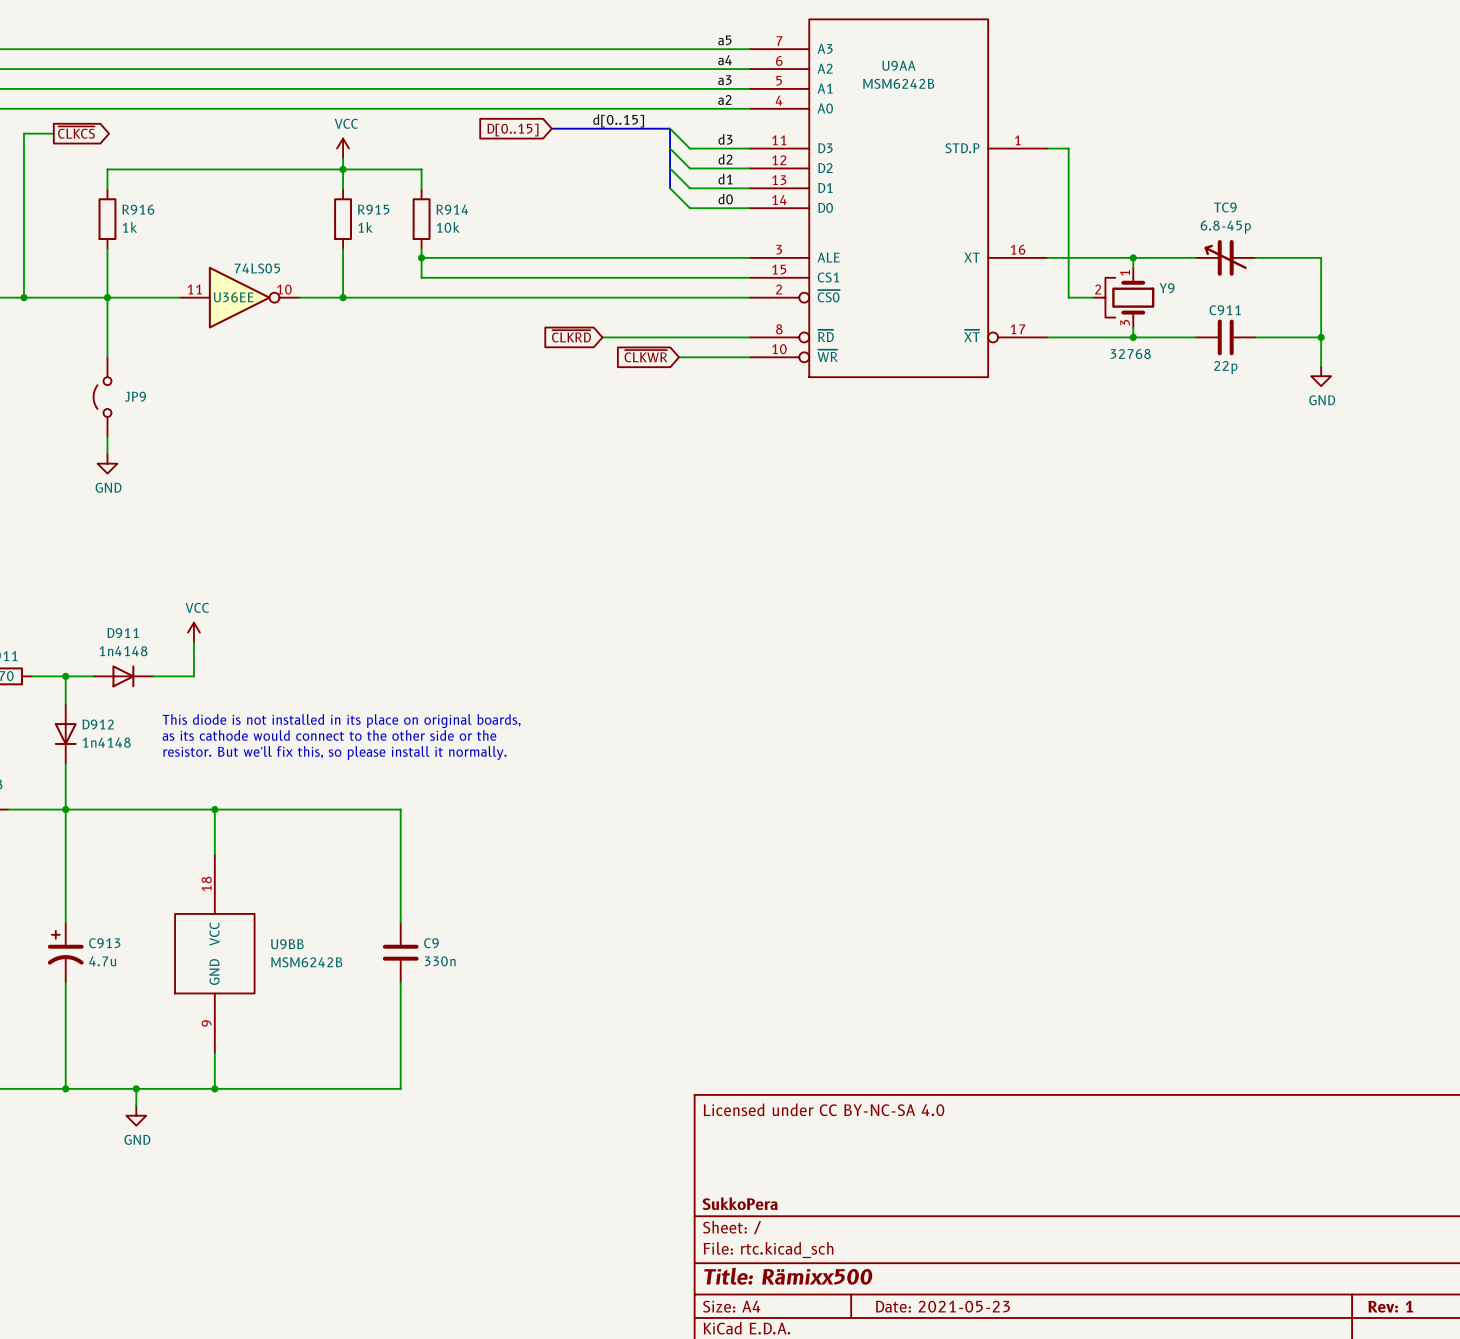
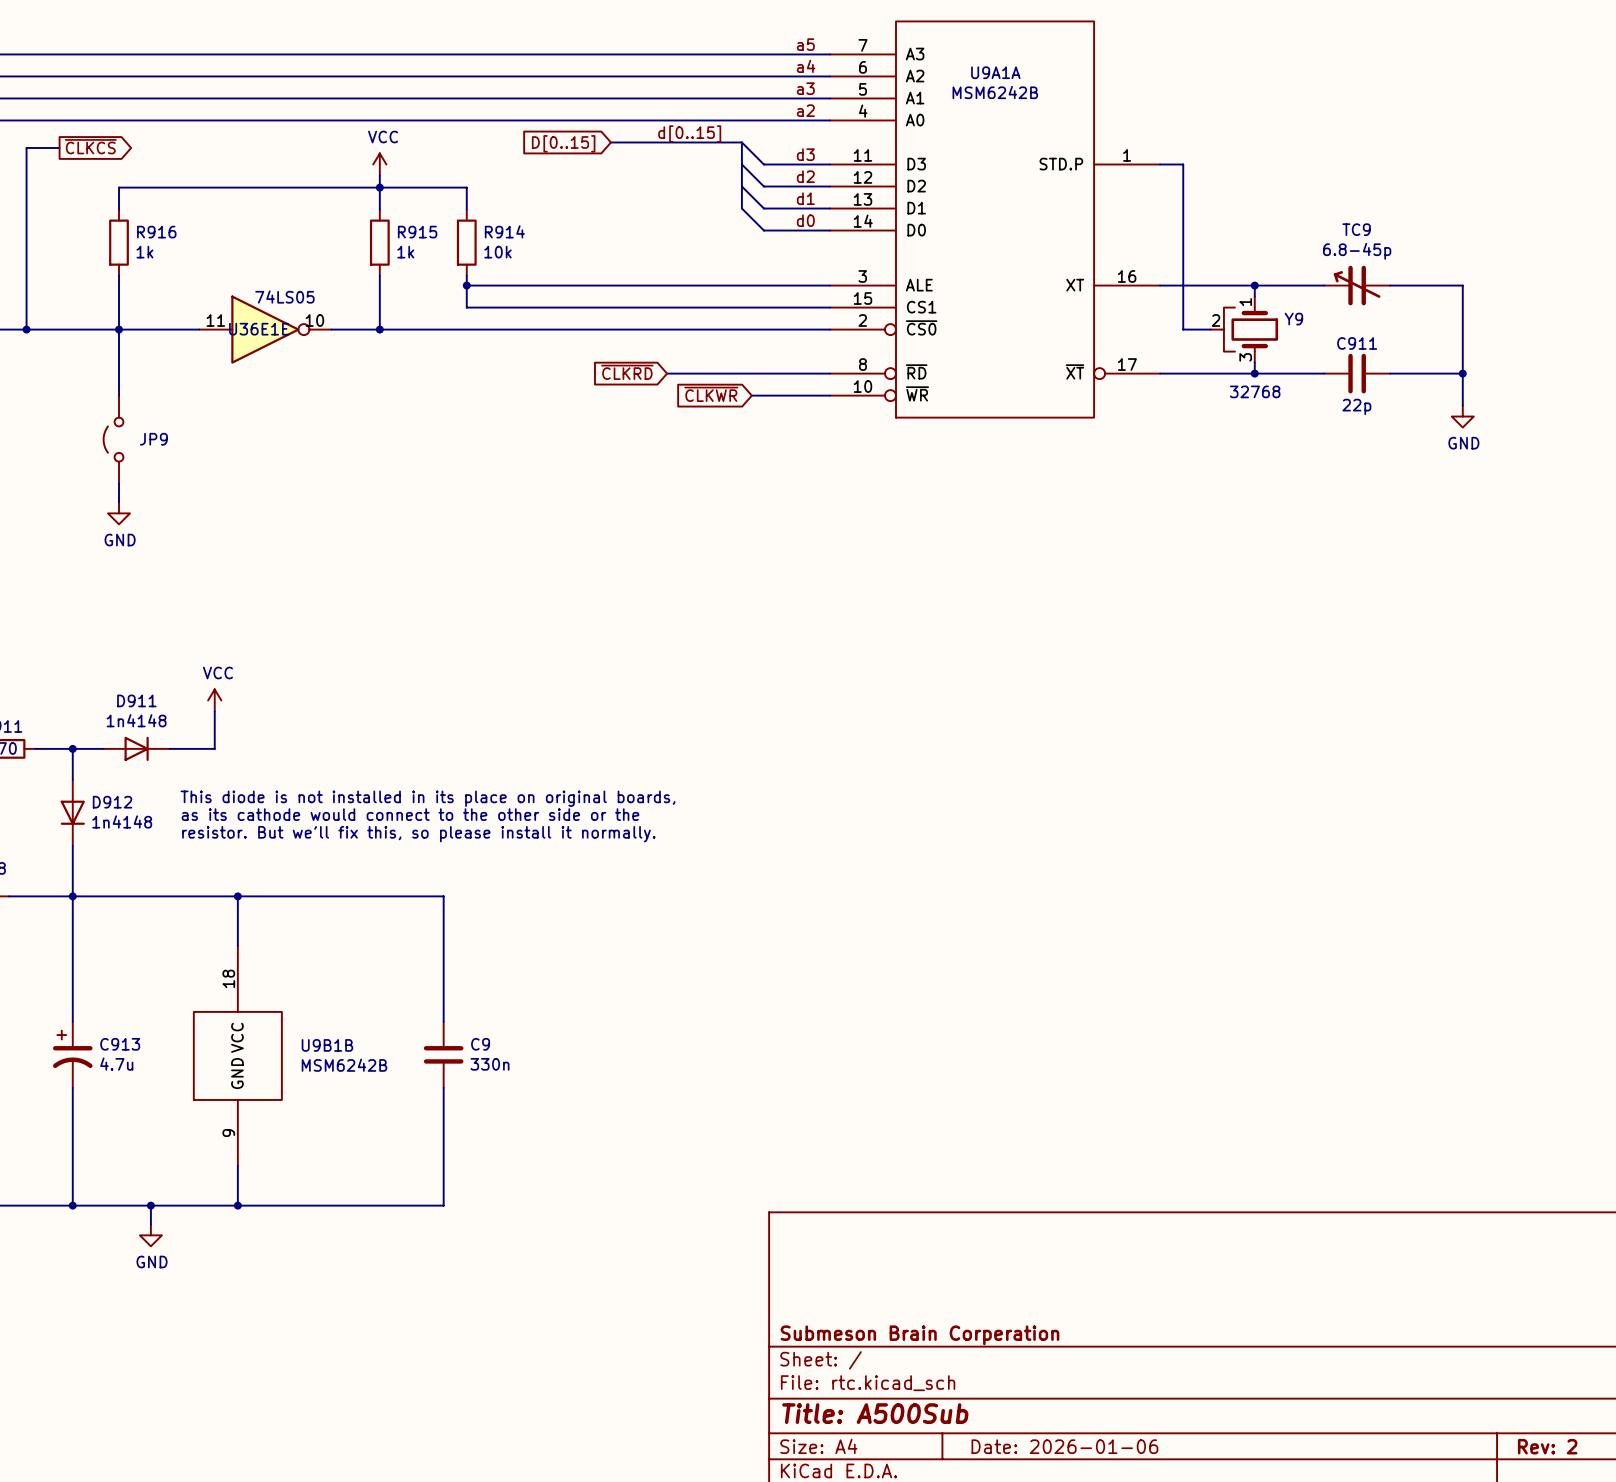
U9AA name: U9AA (898, 65) -> U9A1A (995, 72)
U36EE name: U36EE (233, 297) -> U36E1E (259, 329)
U9BB name: U9BB (287, 944) -> U9B1B (327, 1045)
title block: Licensed under CC BY-NC-SA 4.0 (823, 1109) -> none
title block: SukkoPera (740, 1203) -> Submeson Brain Corperation (919, 1335)
title block: Title: Rämixx500 (788, 1276) -> Title: A500Sub (875, 1413)
title block: Date: 2021-05-23 (942, 1306) -> Date: 2026-01-06 (1064, 1446)
title block: Rev: 1 (1390, 1306) -> Rev: 2 (1547, 1446)

